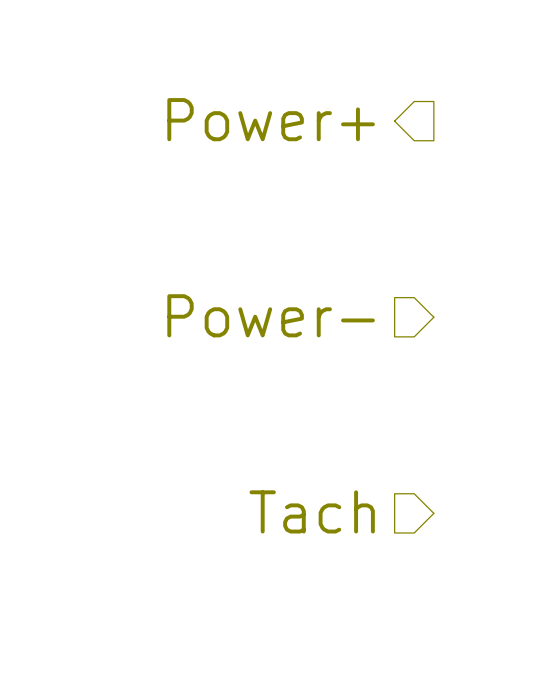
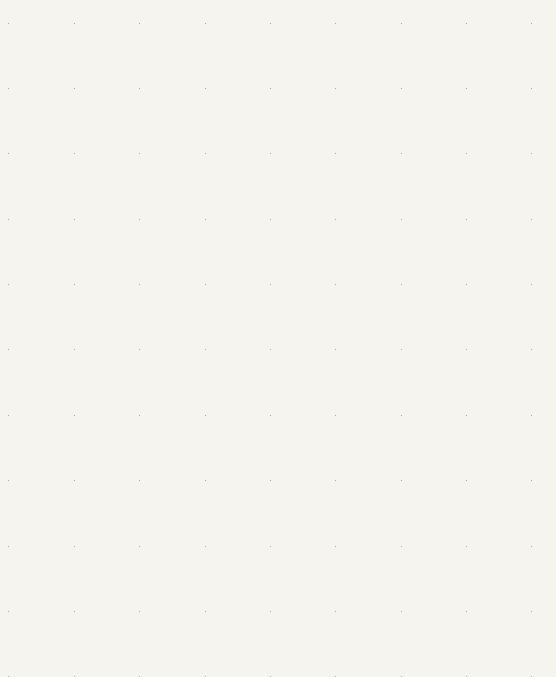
hierarchical label: Power+ (271, 119) -> none
hierarchical label: Power- (271, 315) -> none
hierarchical label: Tach (312, 511) -> none

